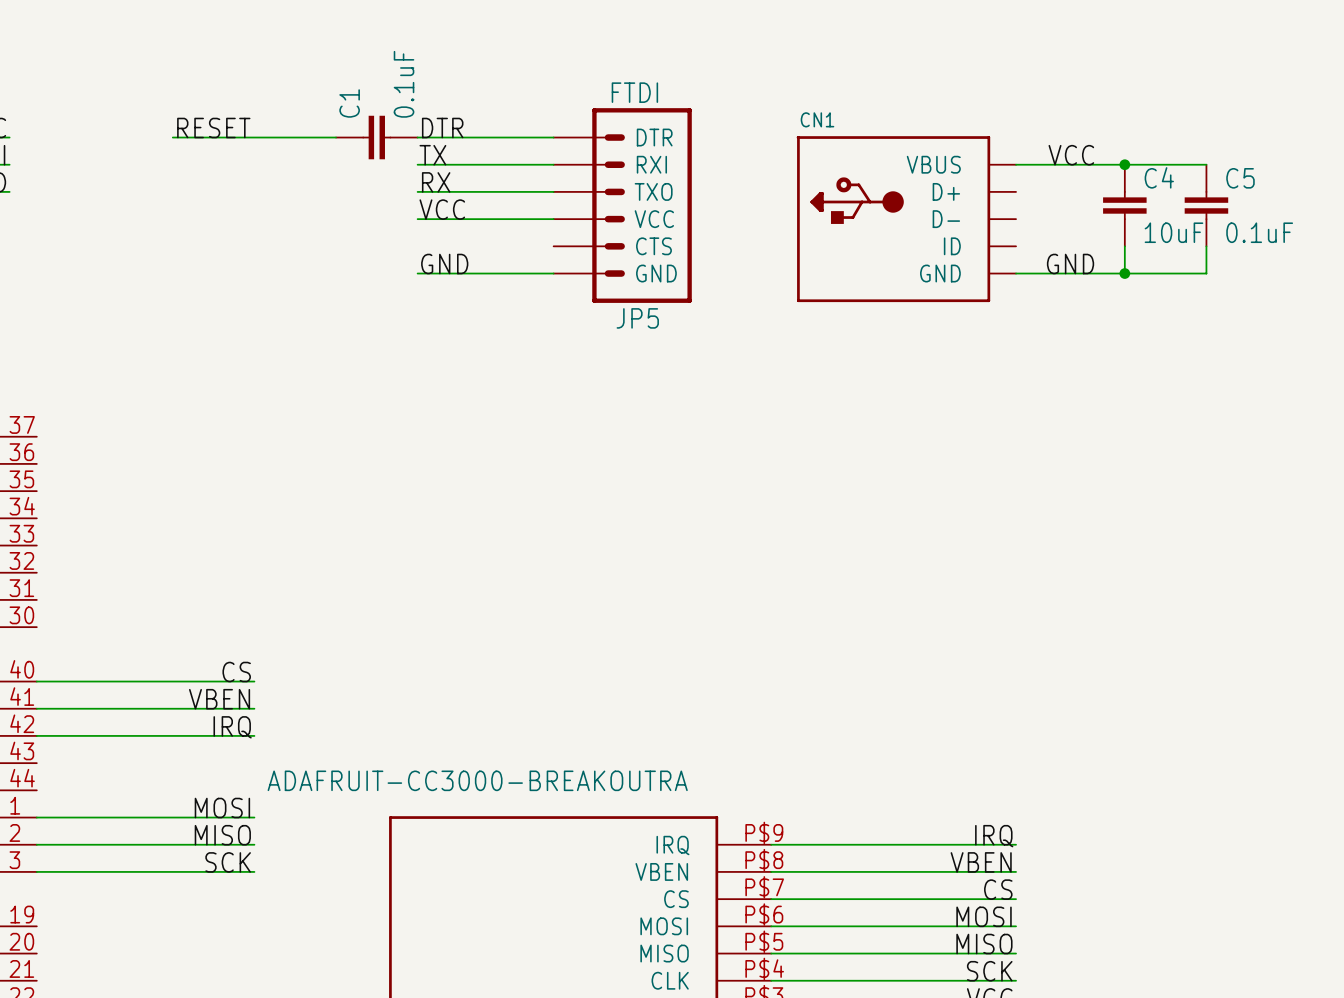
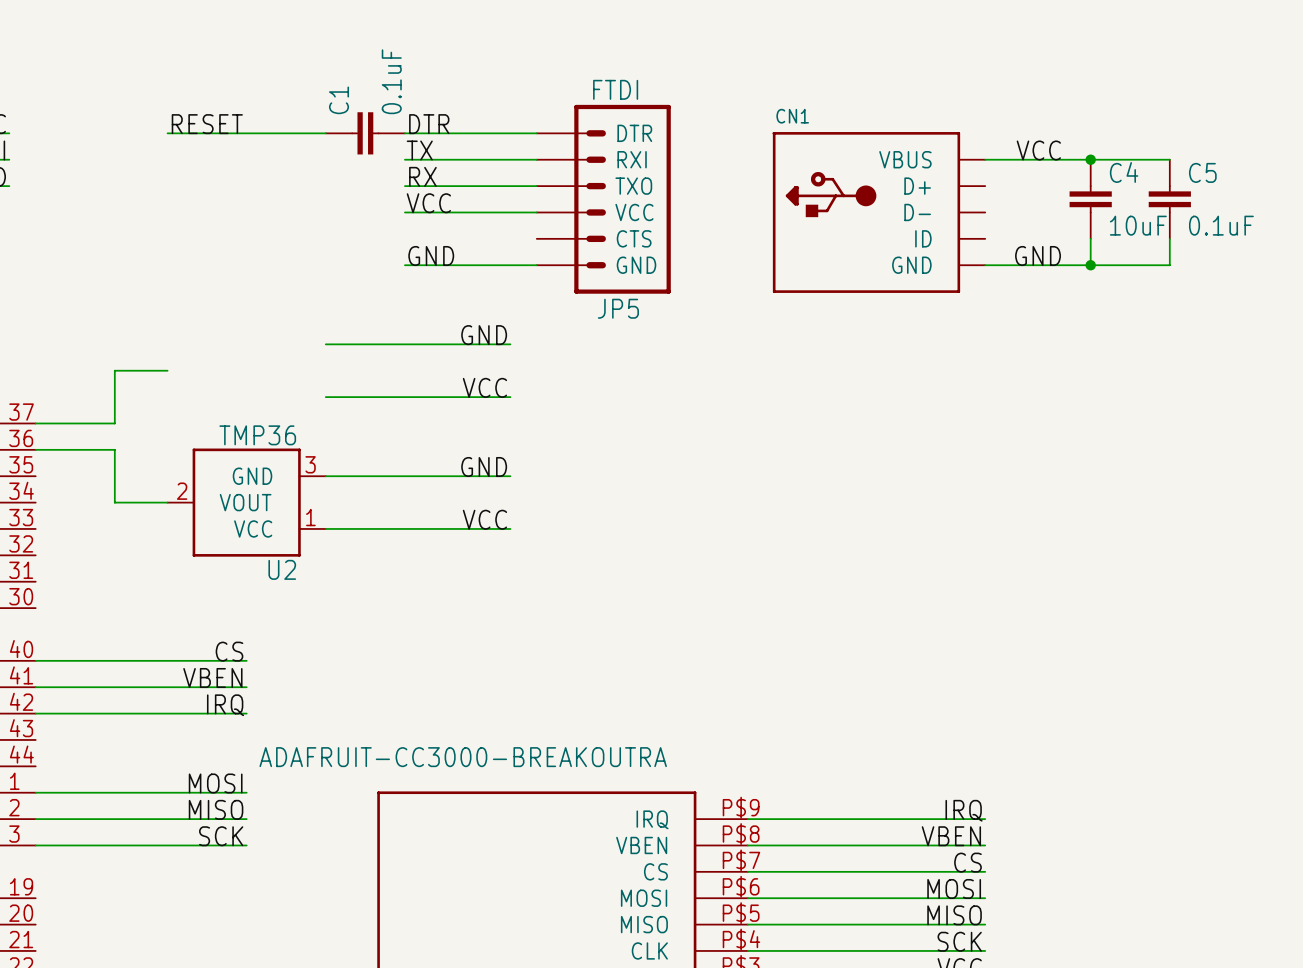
label: none -> GND (484, 335)
wire: none -> (325, 344) (510, 344)
wire: none -> (167, 370) (114, 370) (114, 423) (35, 423)
label: none -> VCC (484, 387)
wire: none -> (325, 397) (510, 397)
wire: none -> (35, 449) (114, 449) (114, 502) (167, 502)
label: none -> GND (484, 466)
wire: none -> (325, 476) (510, 476)
U2: none -> TMP36 (246, 502)
label: none -> VCC (484, 519)
wire: none -> (325, 528) (510, 528)

